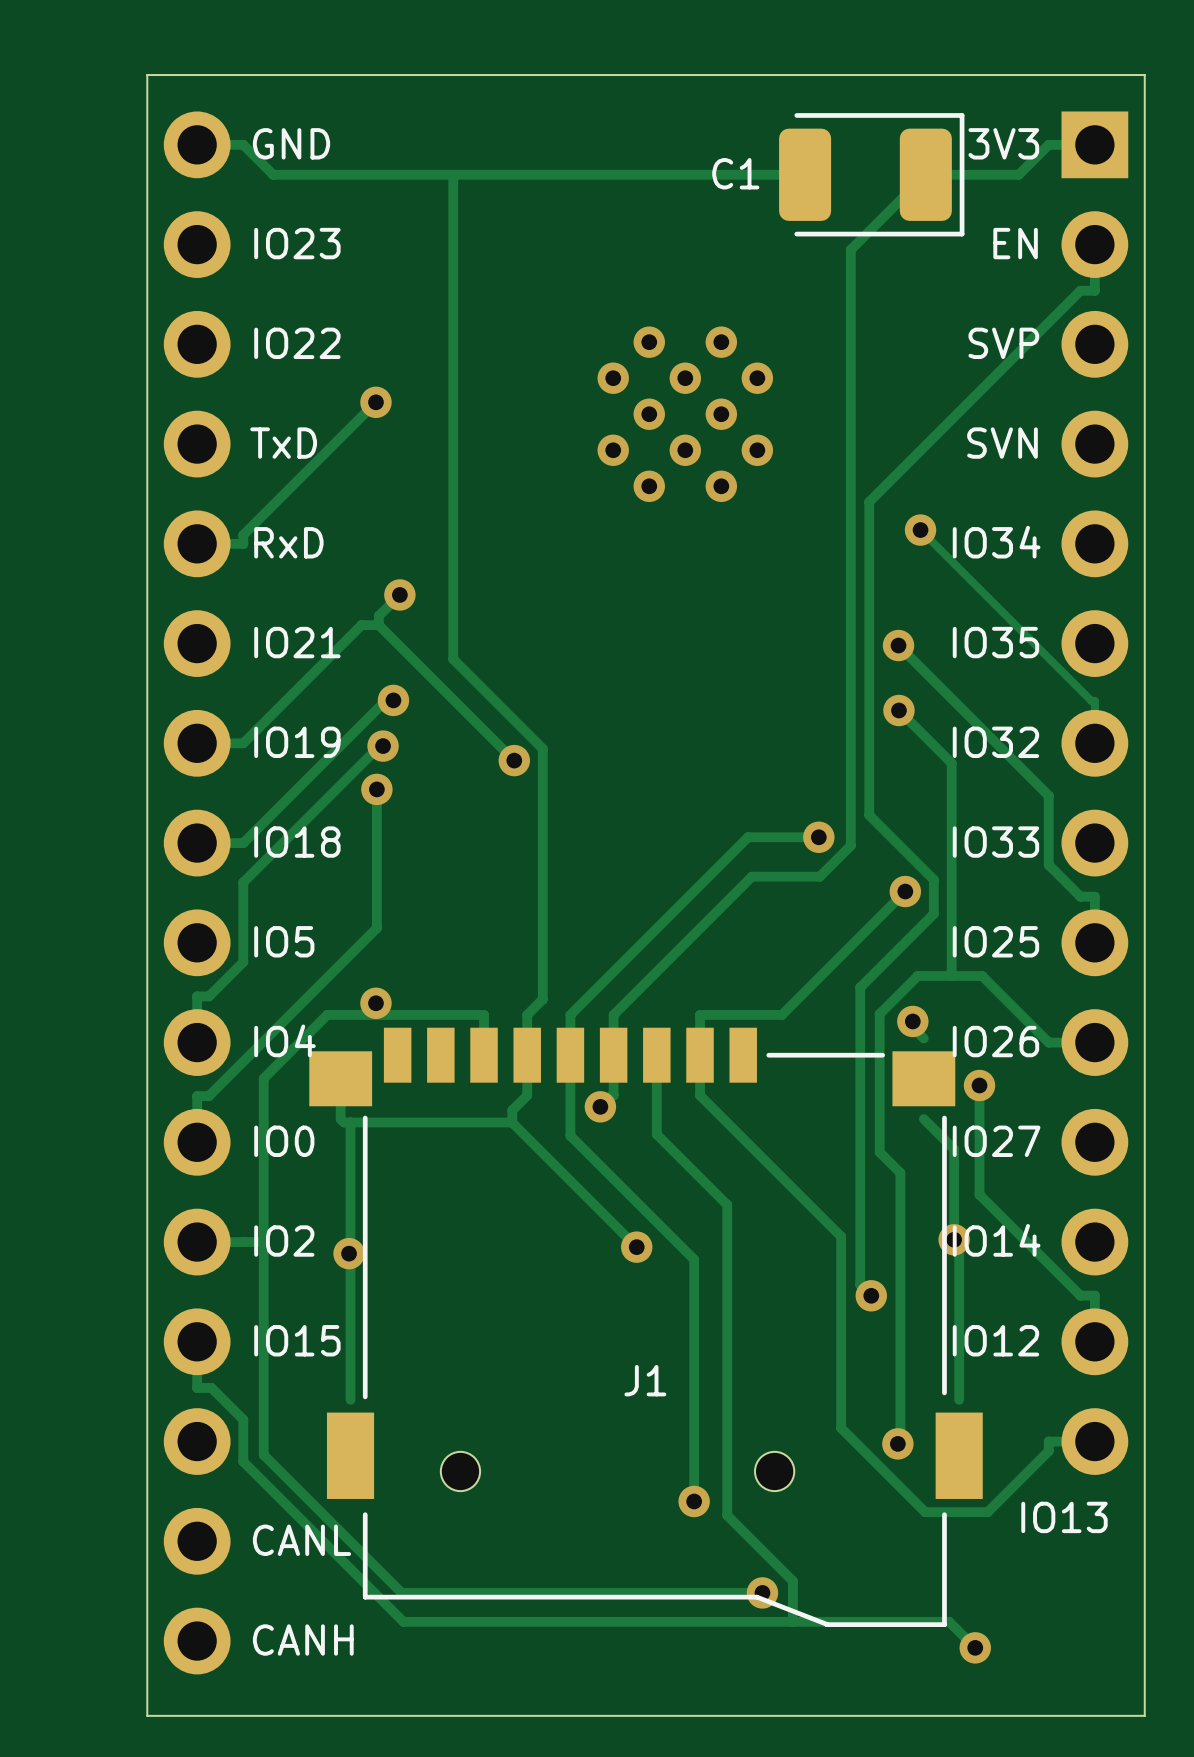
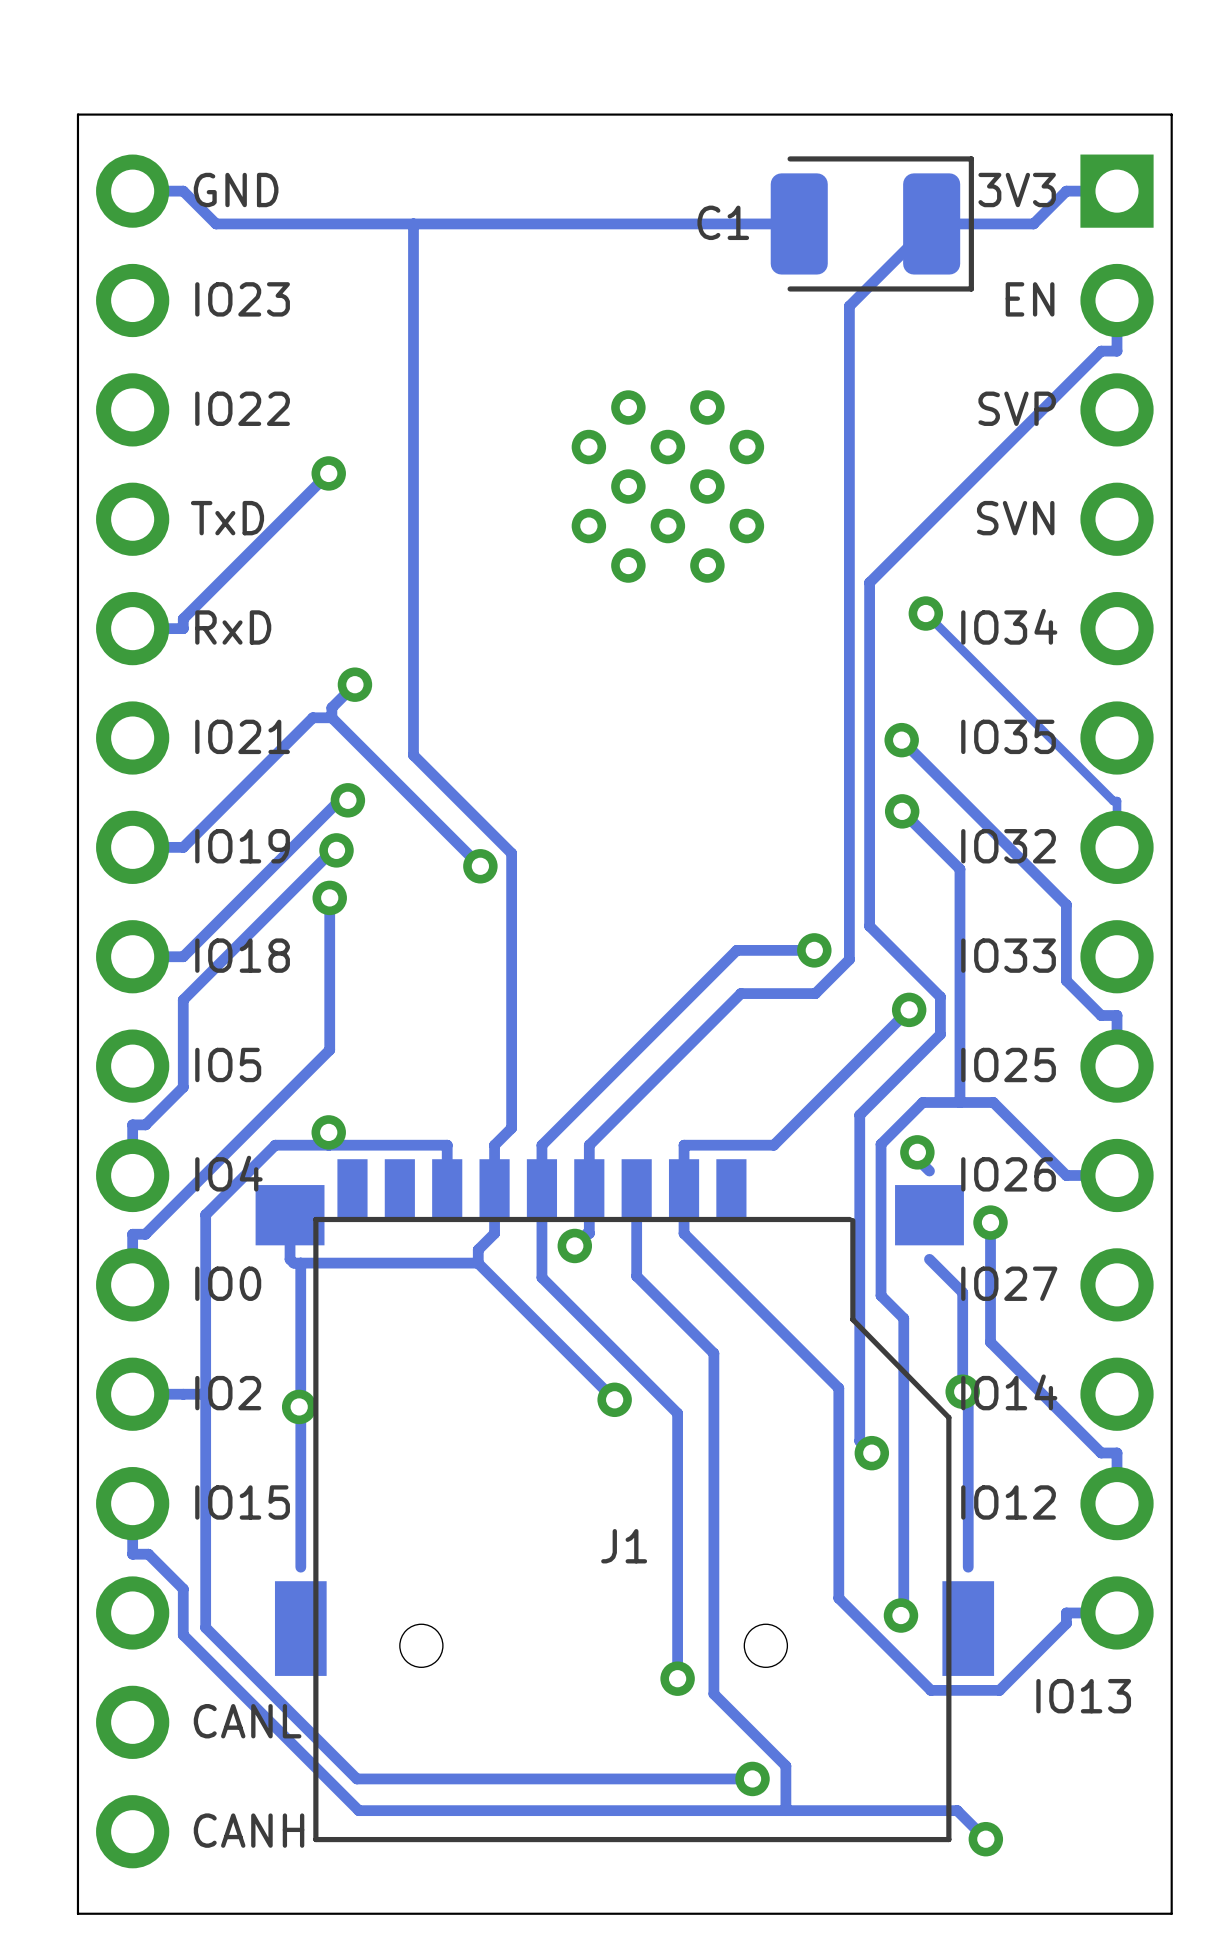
J1 footprint: [309, 1027, 983, 1627] -> [255, 1159, 995, 1843]

